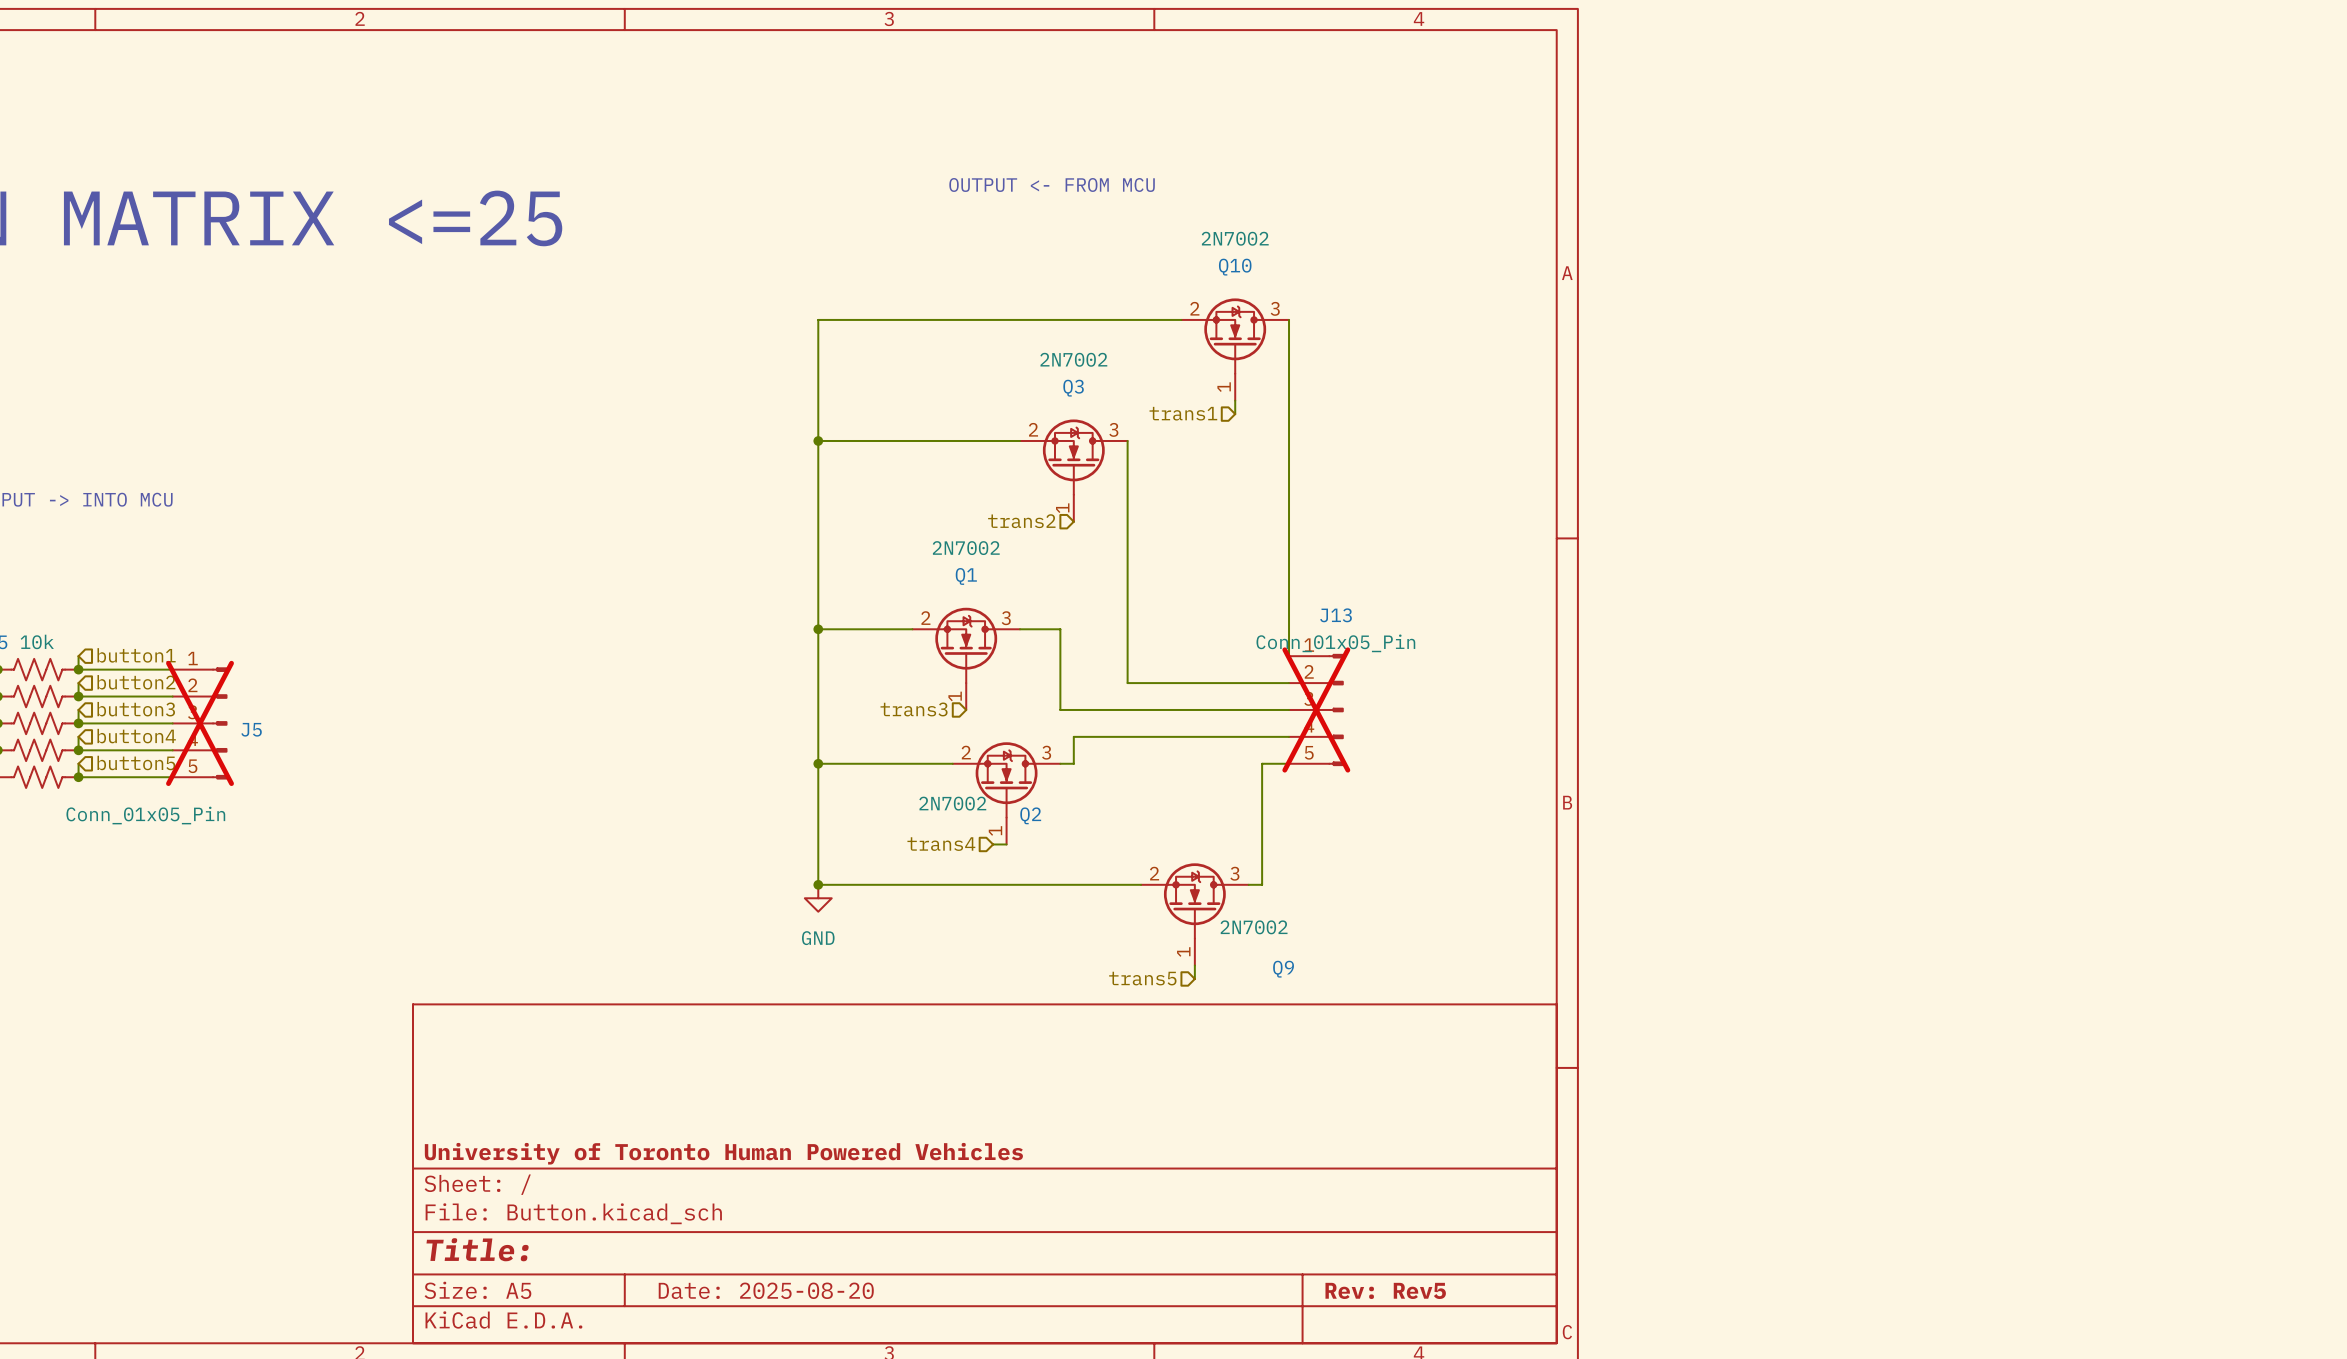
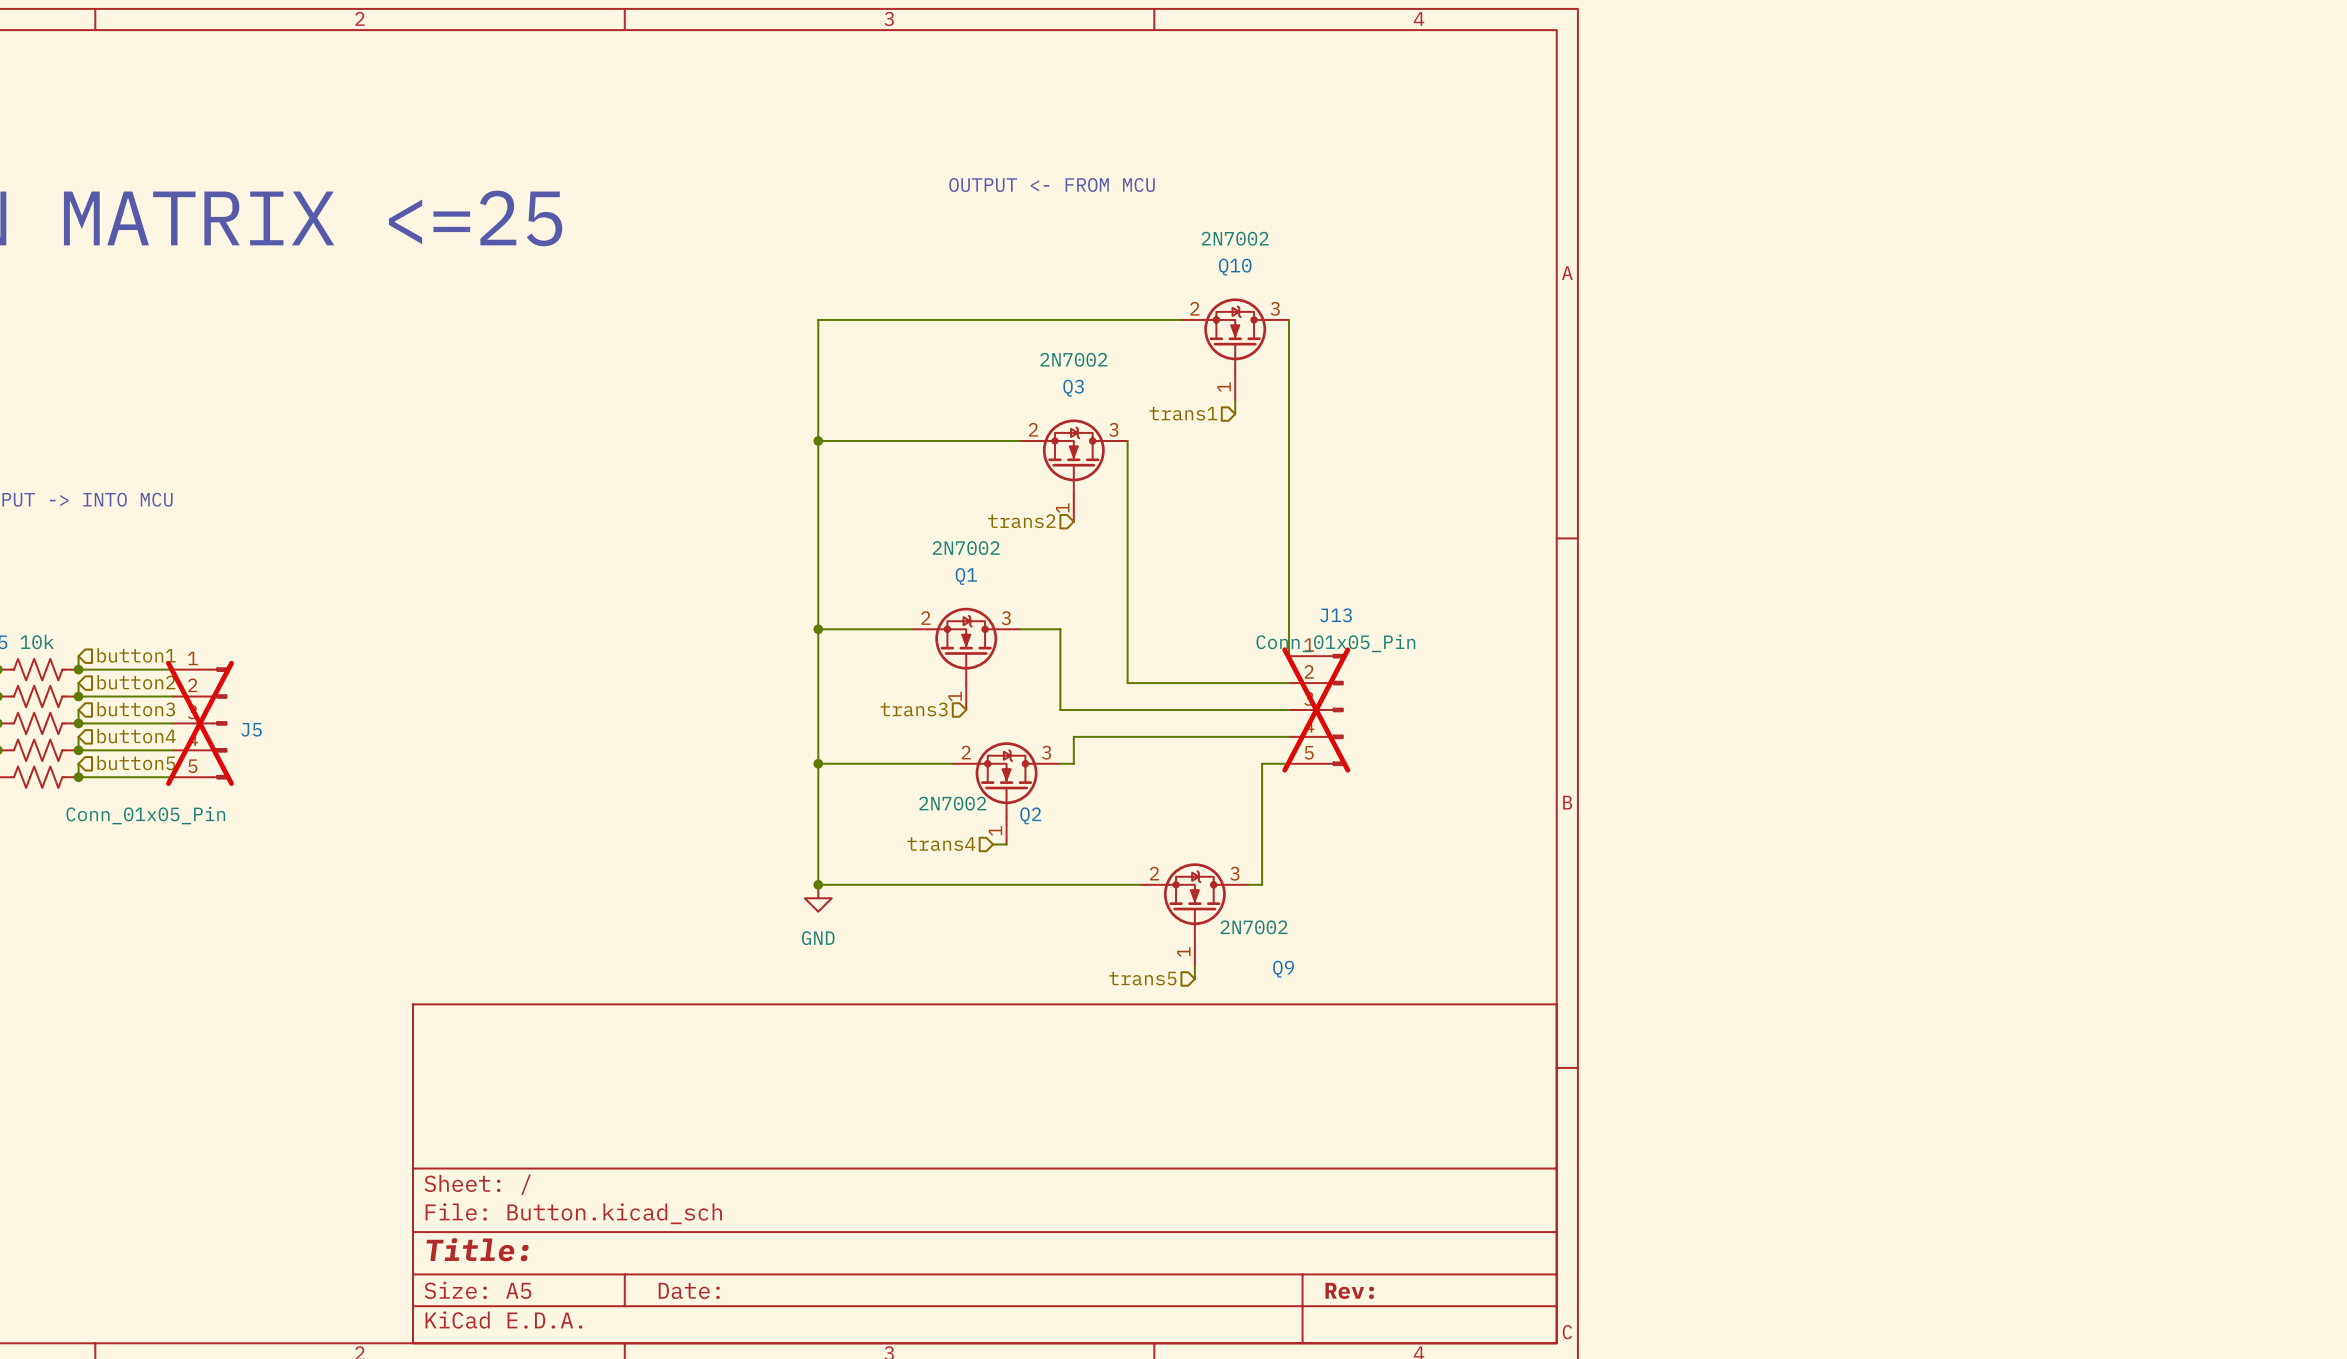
title block: University of Toronto Human Powered Vehicles (723, 1153) -> none
title block: Date: 2025-08-20 (766, 1290) -> Date: (689, 1290)
title block: Rev: Rev5 (1385, 1290) -> Rev: (1349, 1290)

